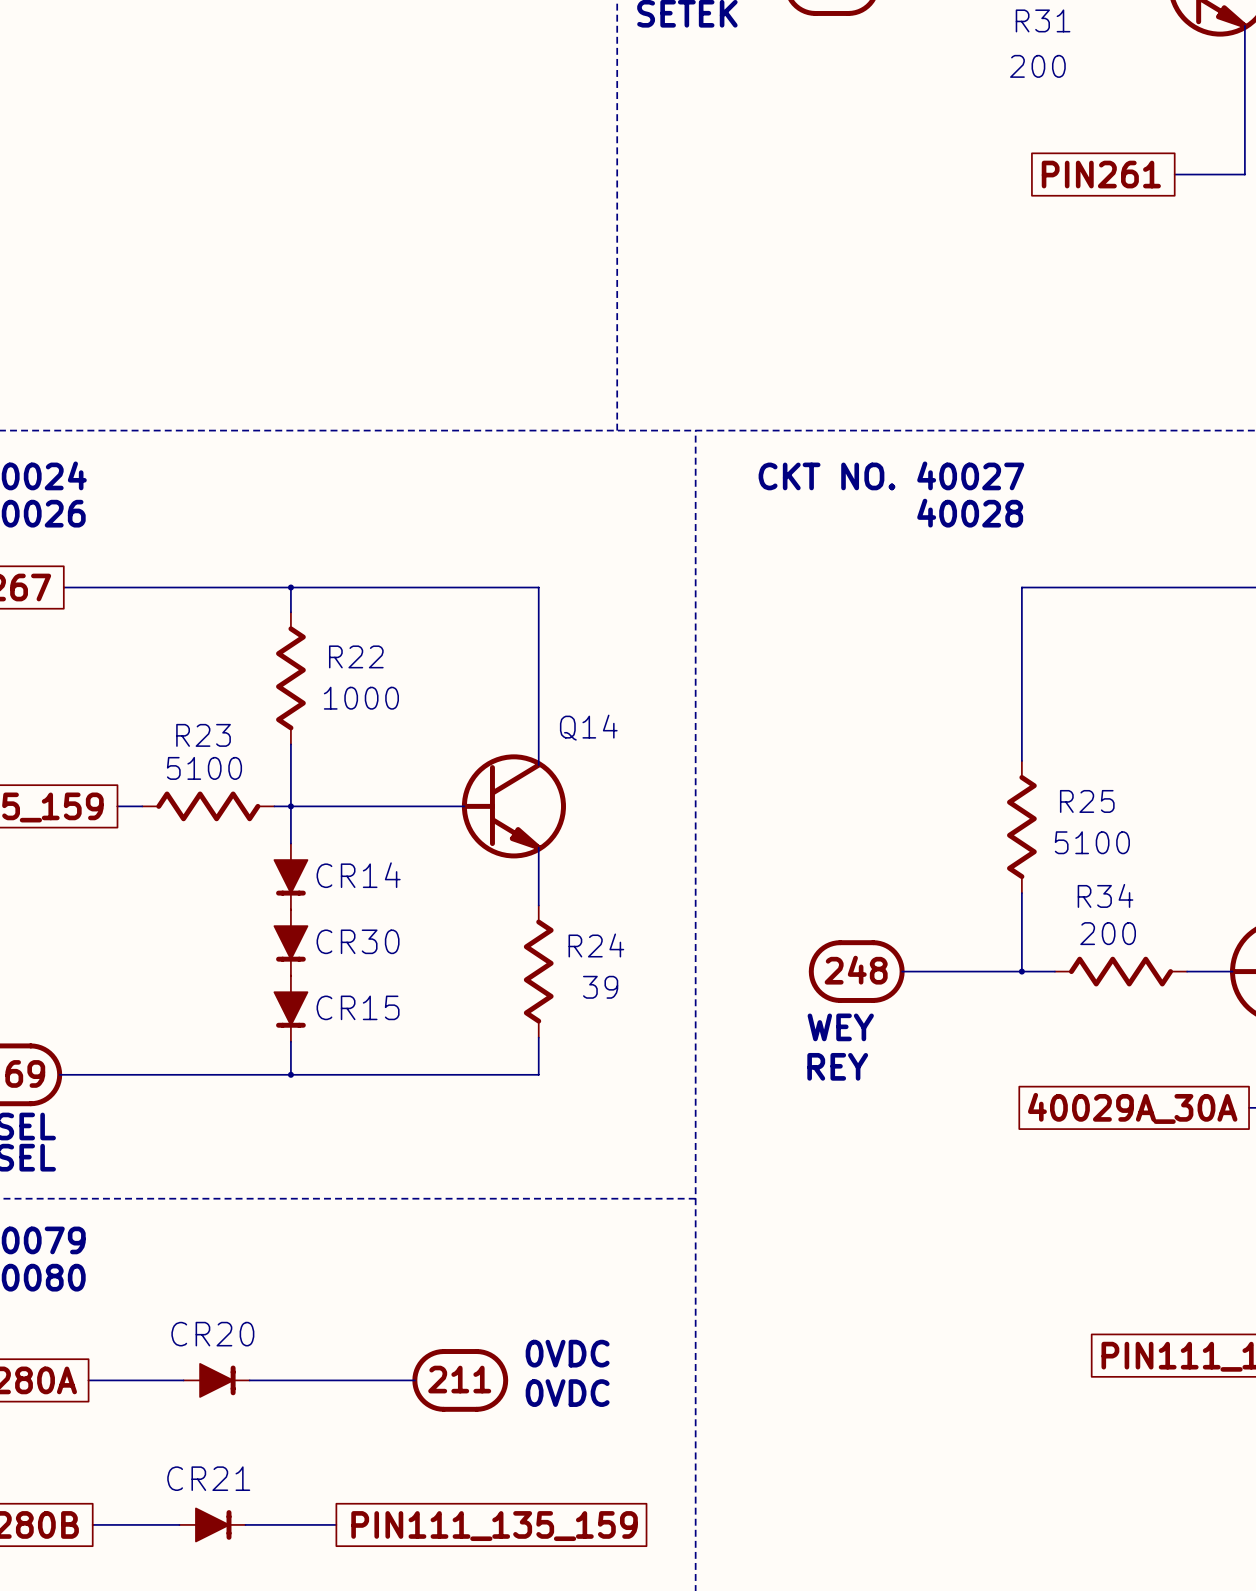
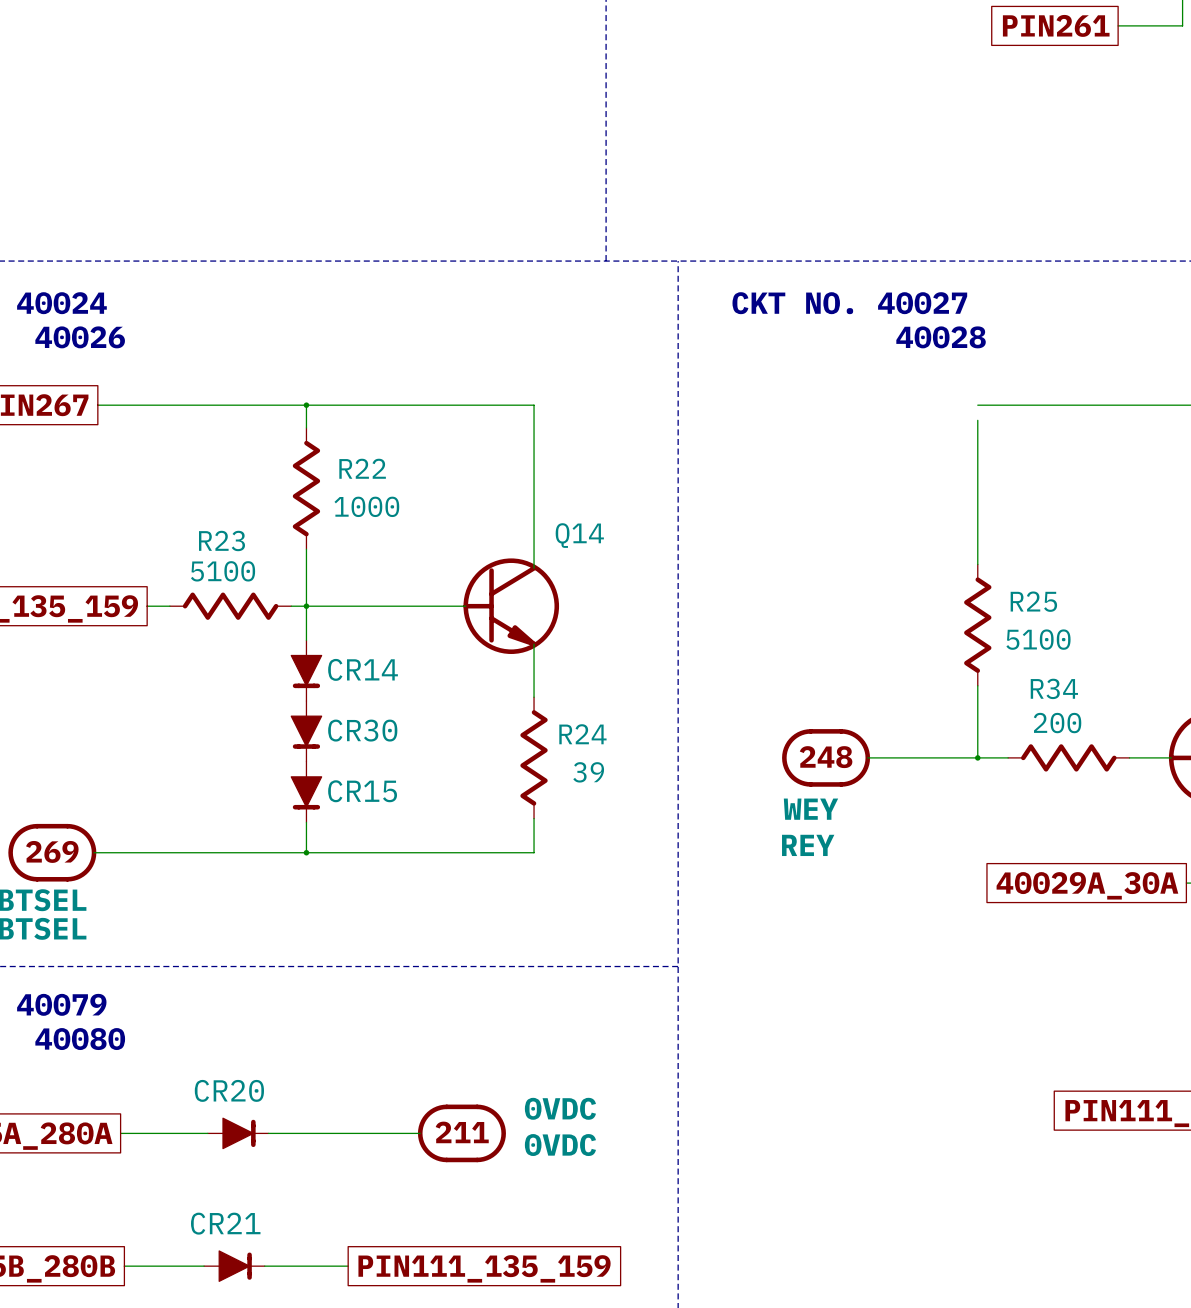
wire: (1021, 587) (1021, 604) -> none

